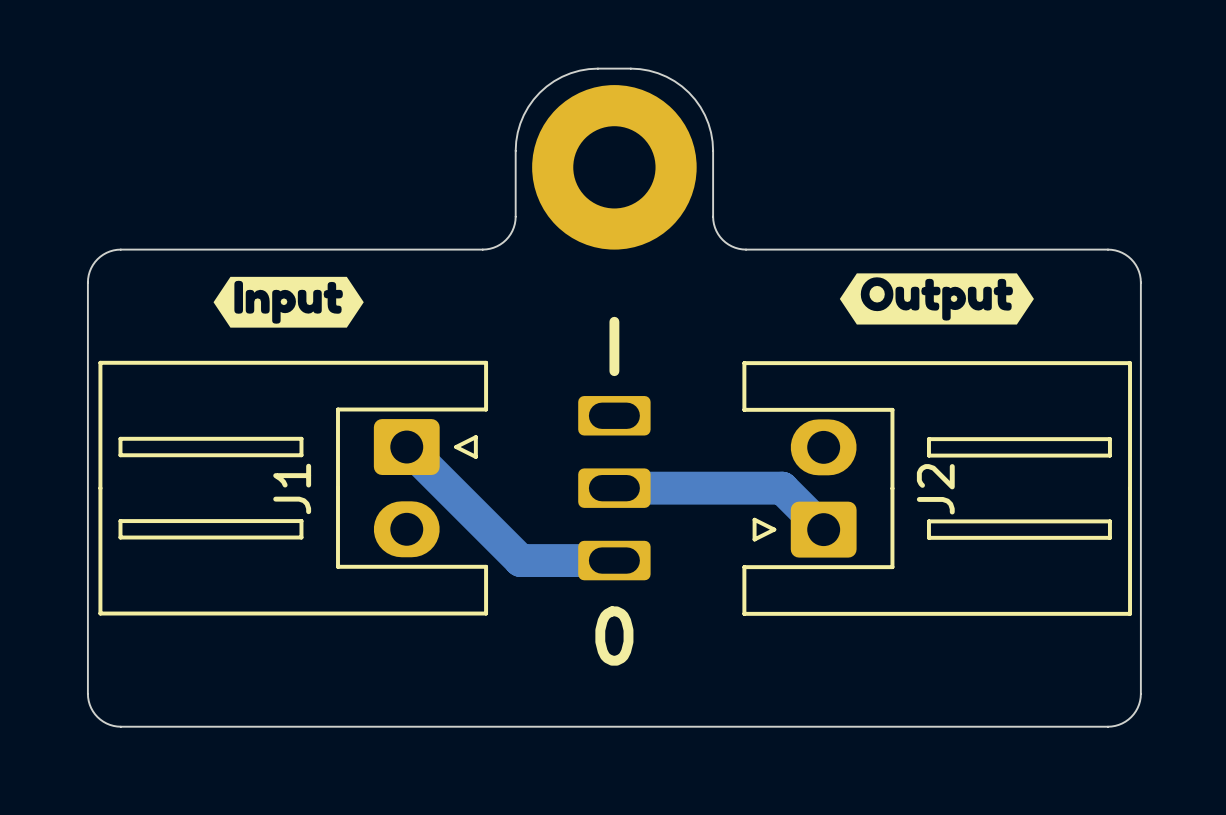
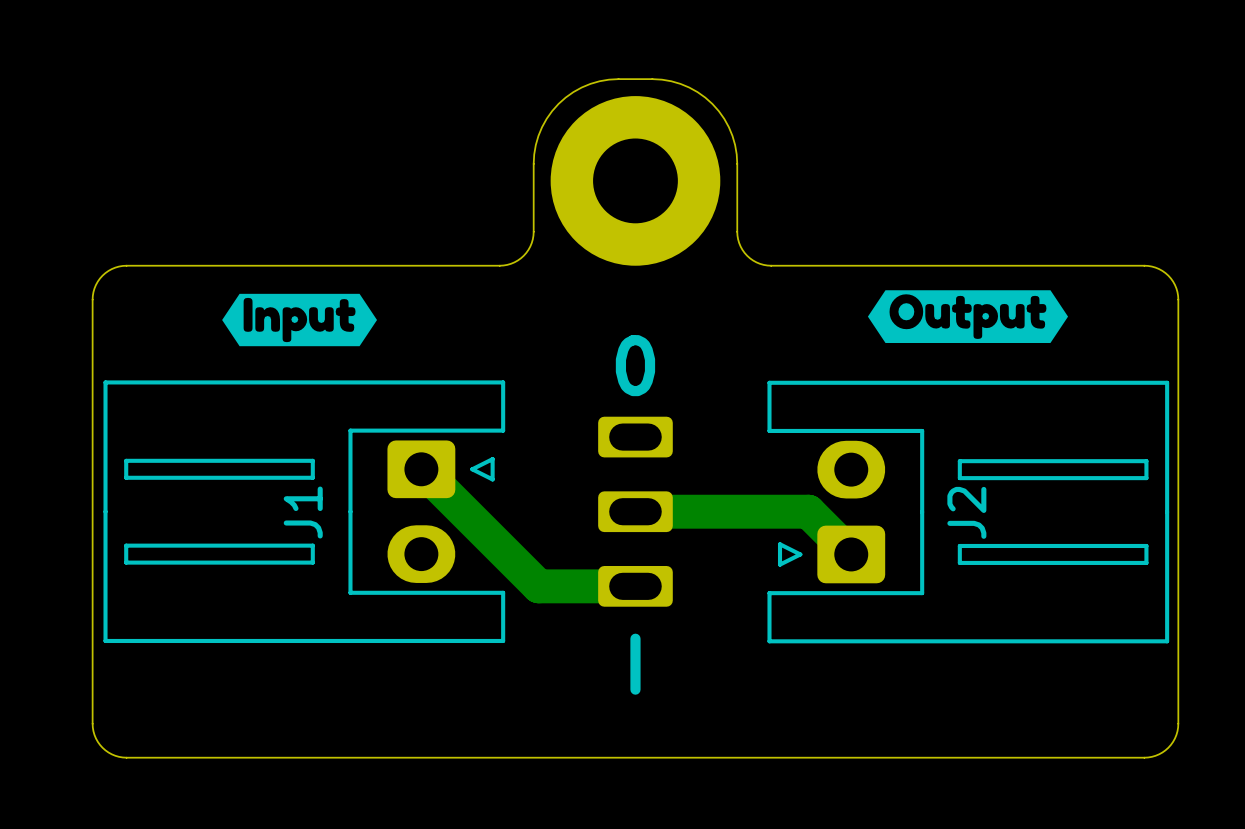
text: I (614, 346) -> 0 (635, 365)
text: 0 (614, 636) -> I (635, 664)

